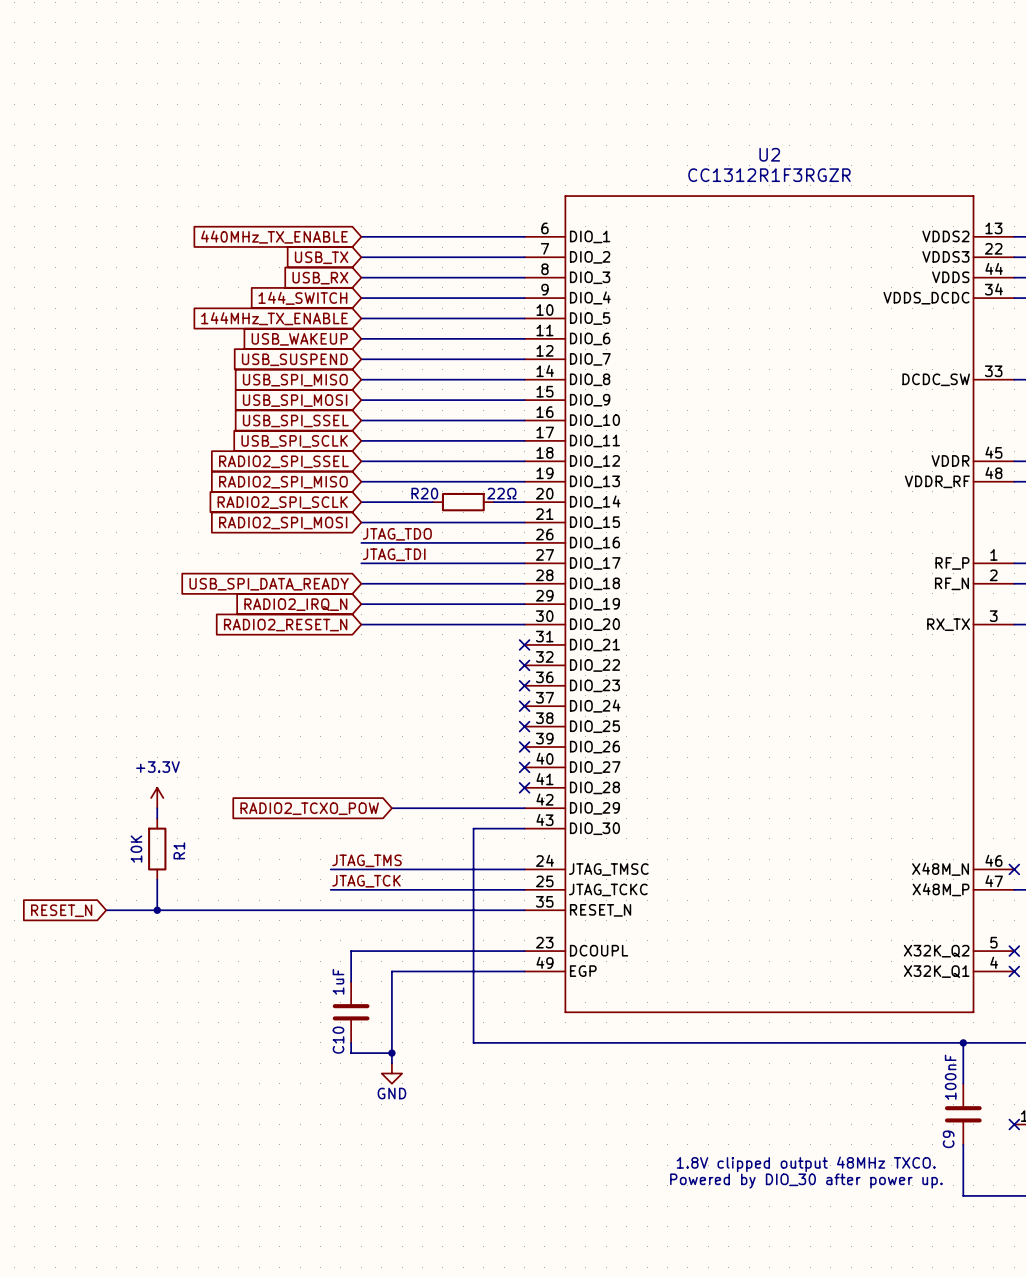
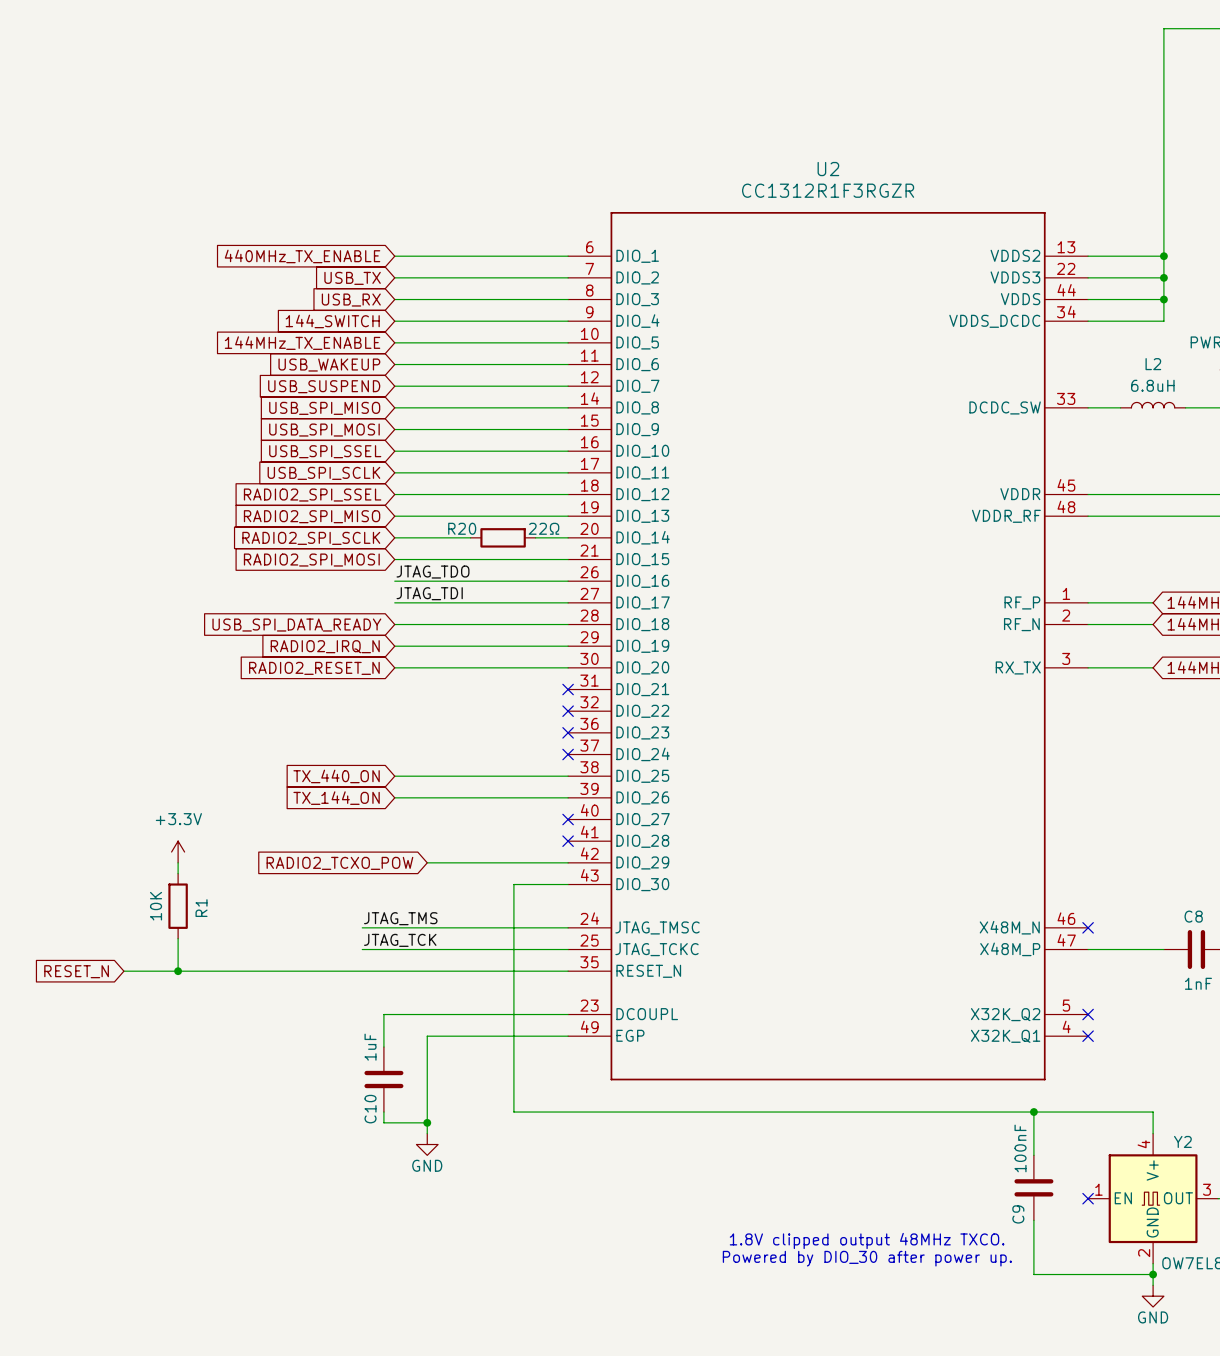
global label: none -> TX_440_ON (336, 776)
wire: none -> (394, 776) (568, 776)
no-connect mark: (524, 726) -> none
global label: none -> TX_144_ON (336, 798)
wire: none -> (394, 797) (568, 797)
no-connect mark: (524, 747) -> none

